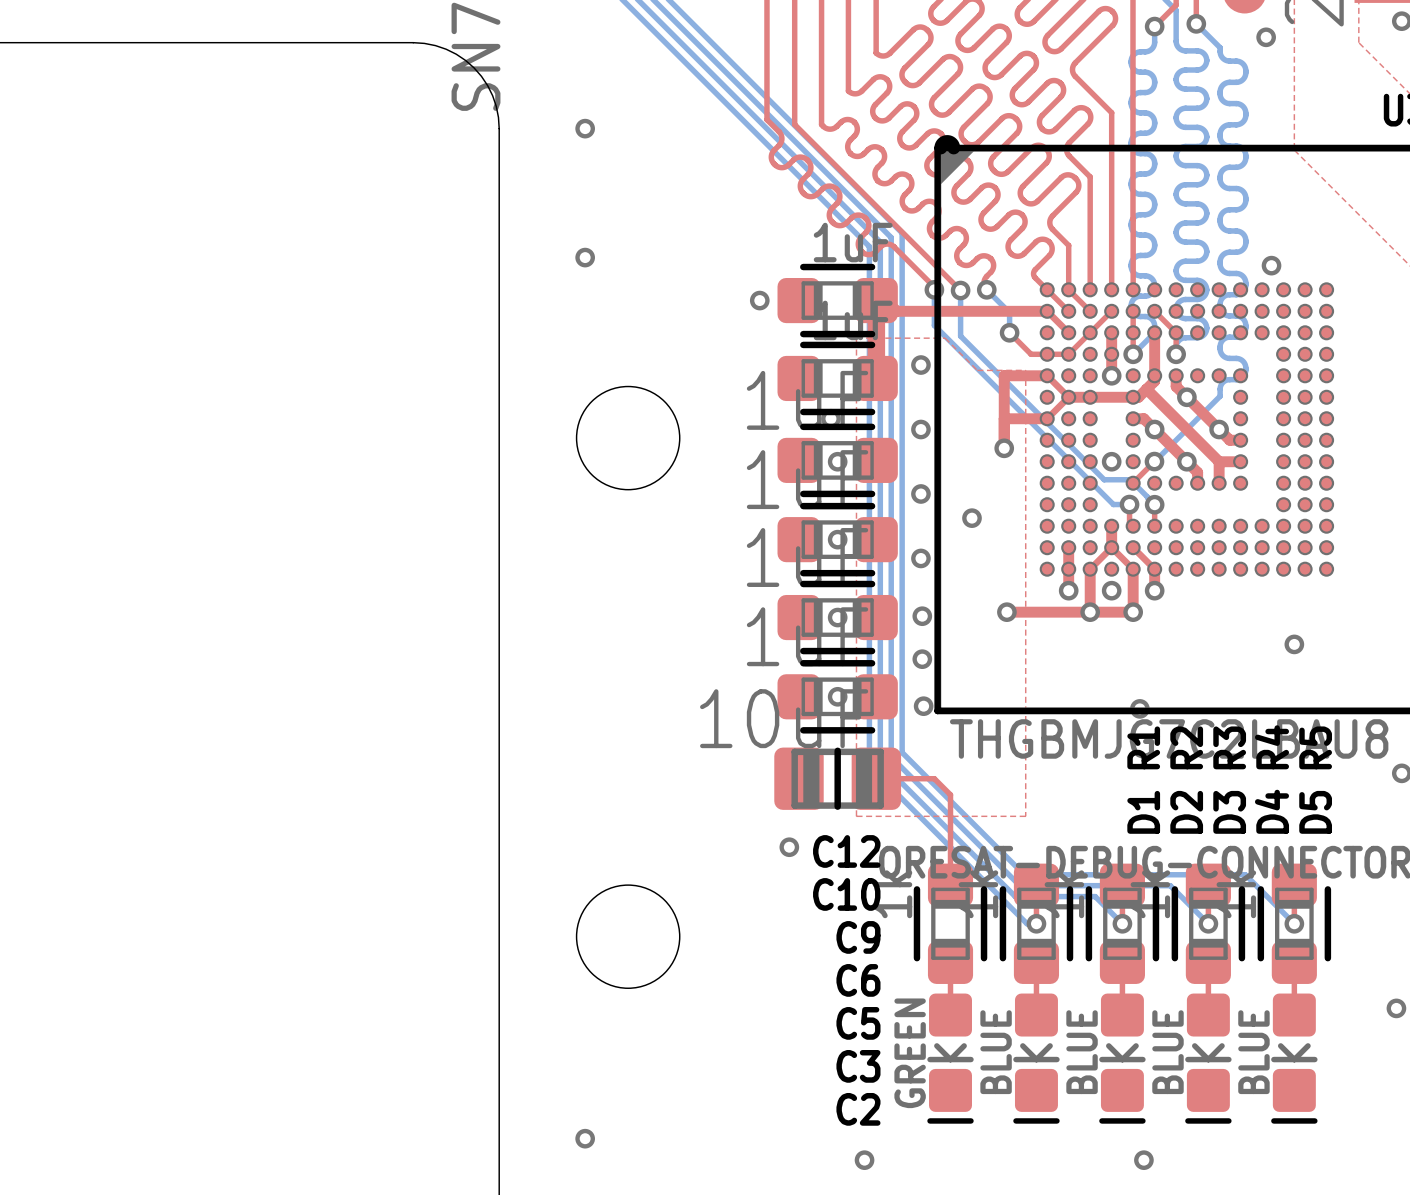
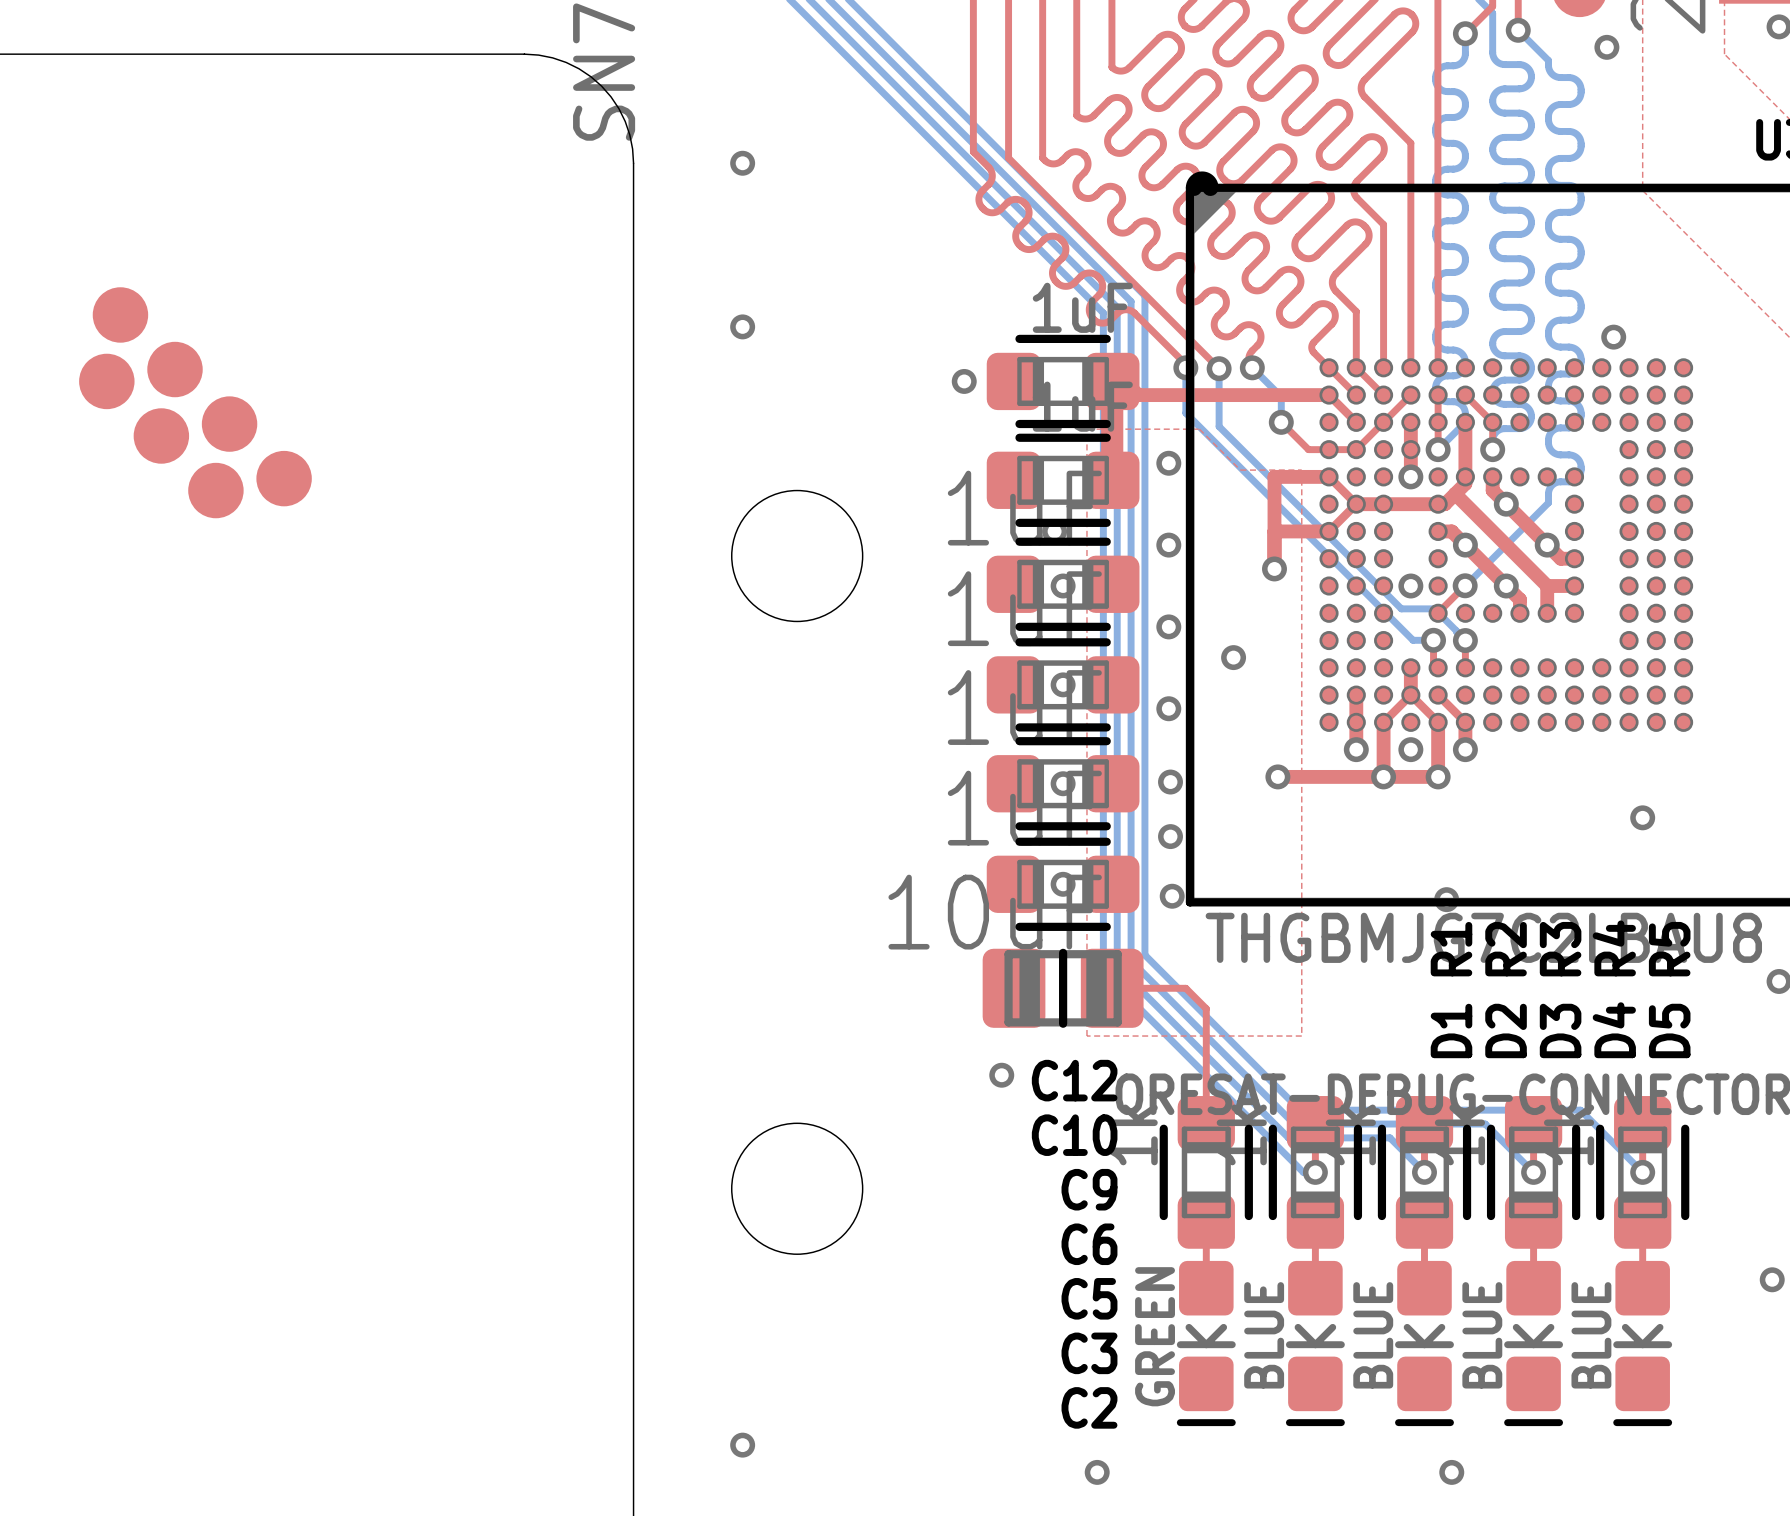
part: none -> (120, 314)
part: none -> (175, 369)
part: none -> (106, 381)
part: none -> (229, 424)
part: none -> (161, 435)
part: none -> (284, 478)
part: none -> (215, 490)

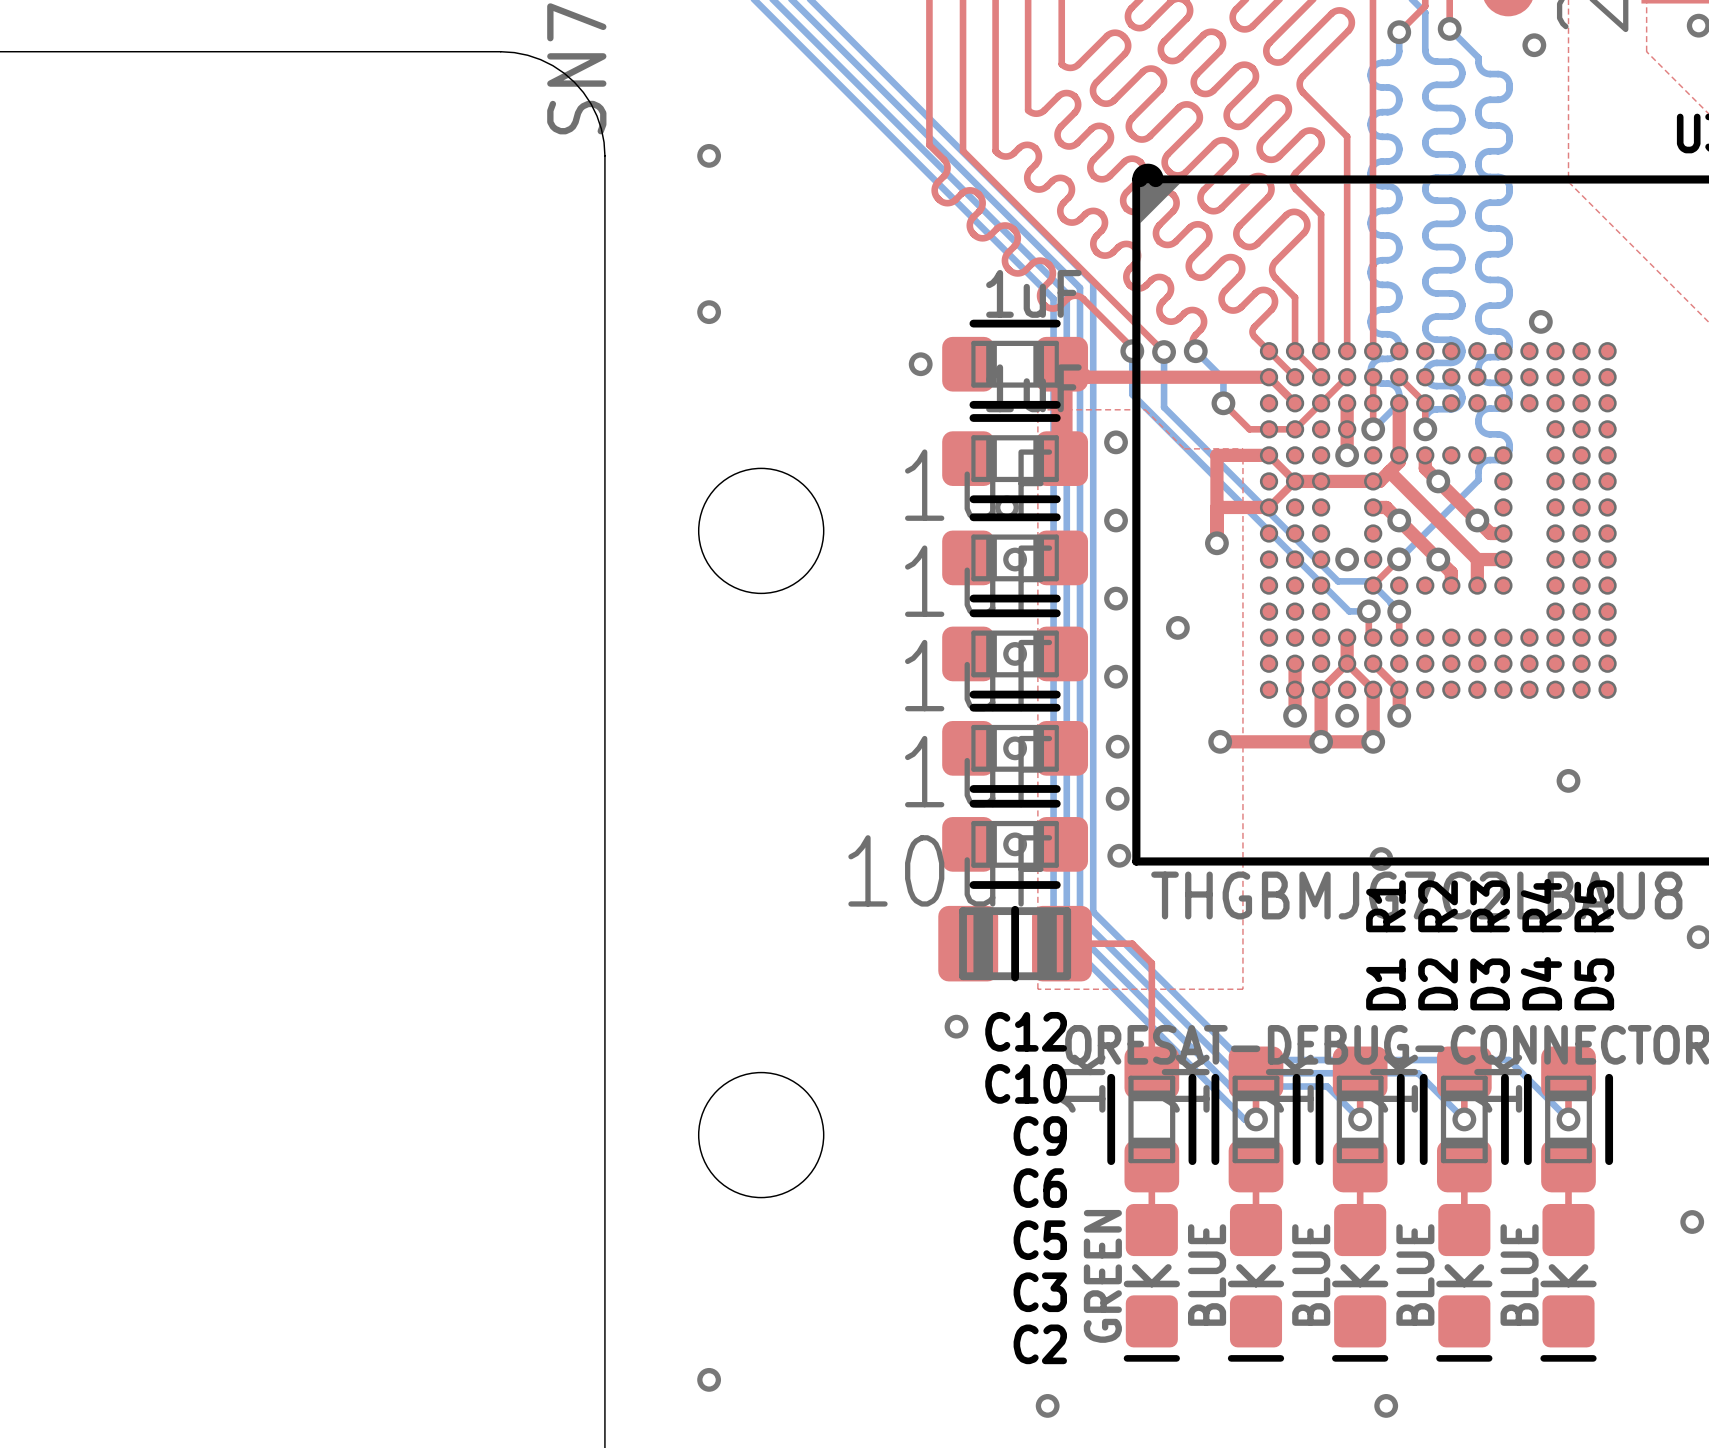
part: (120, 314) -> none
part: (175, 369) -> none
part: (106, 381) -> none
part: (229, 424) -> none
part: (161, 435) -> none
part: (284, 478) -> none
part: (215, 490) -> none

